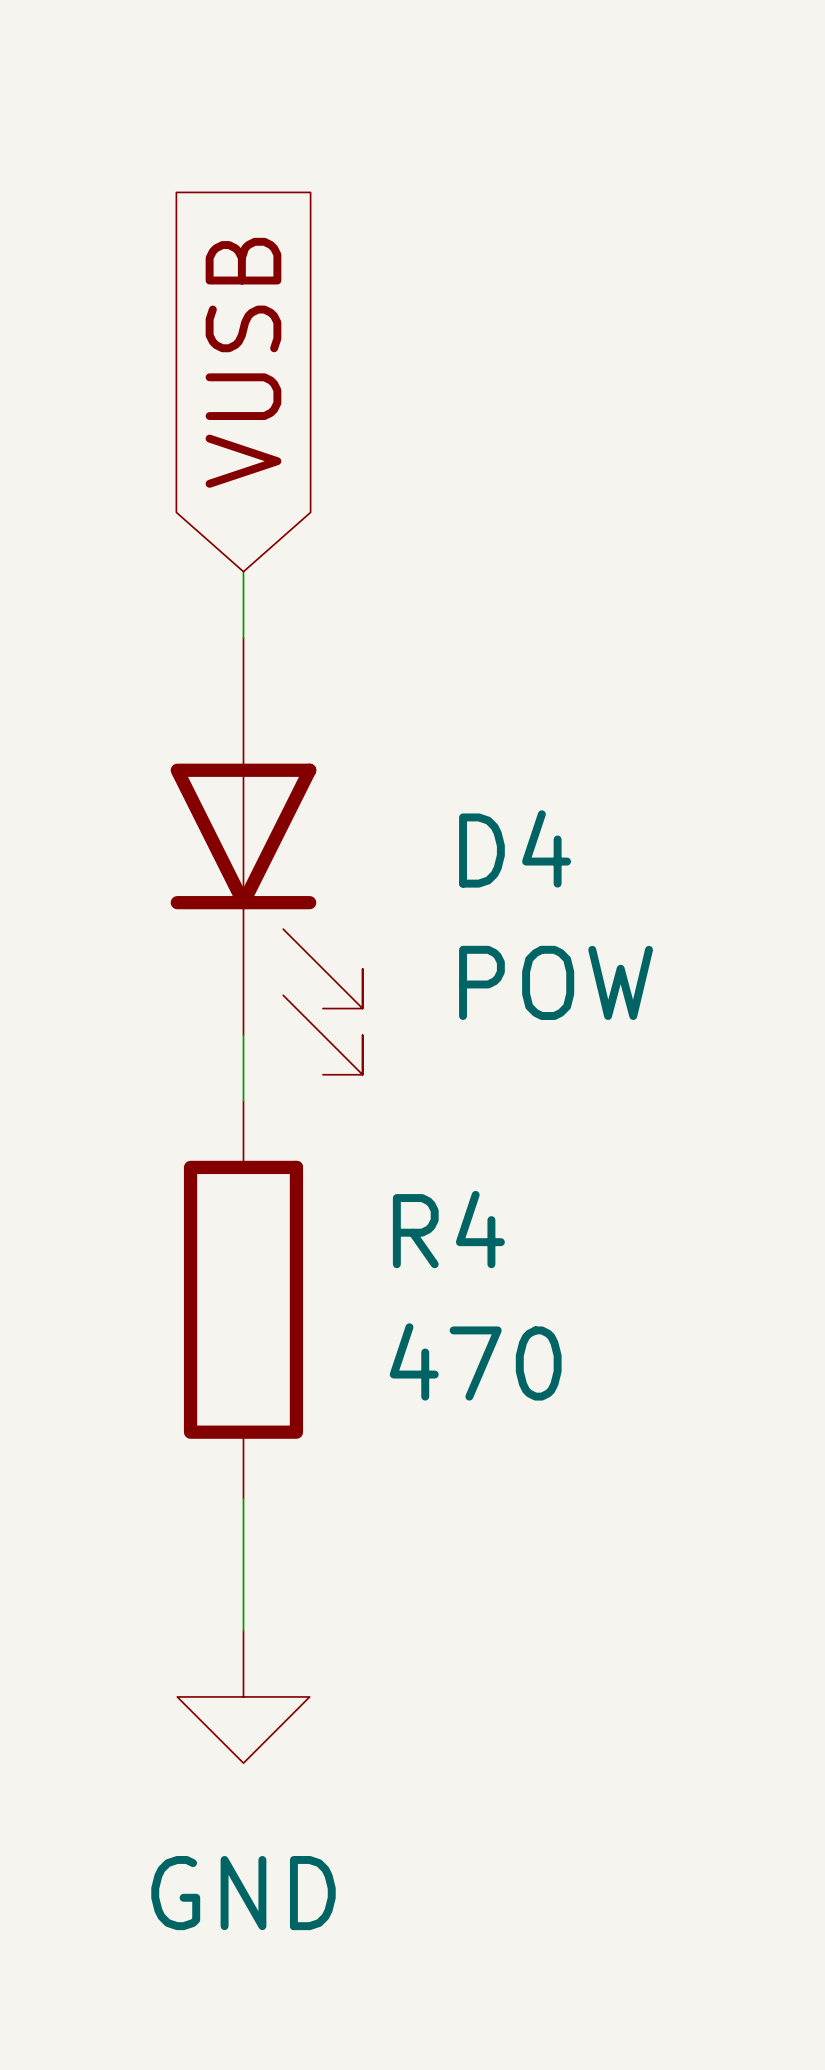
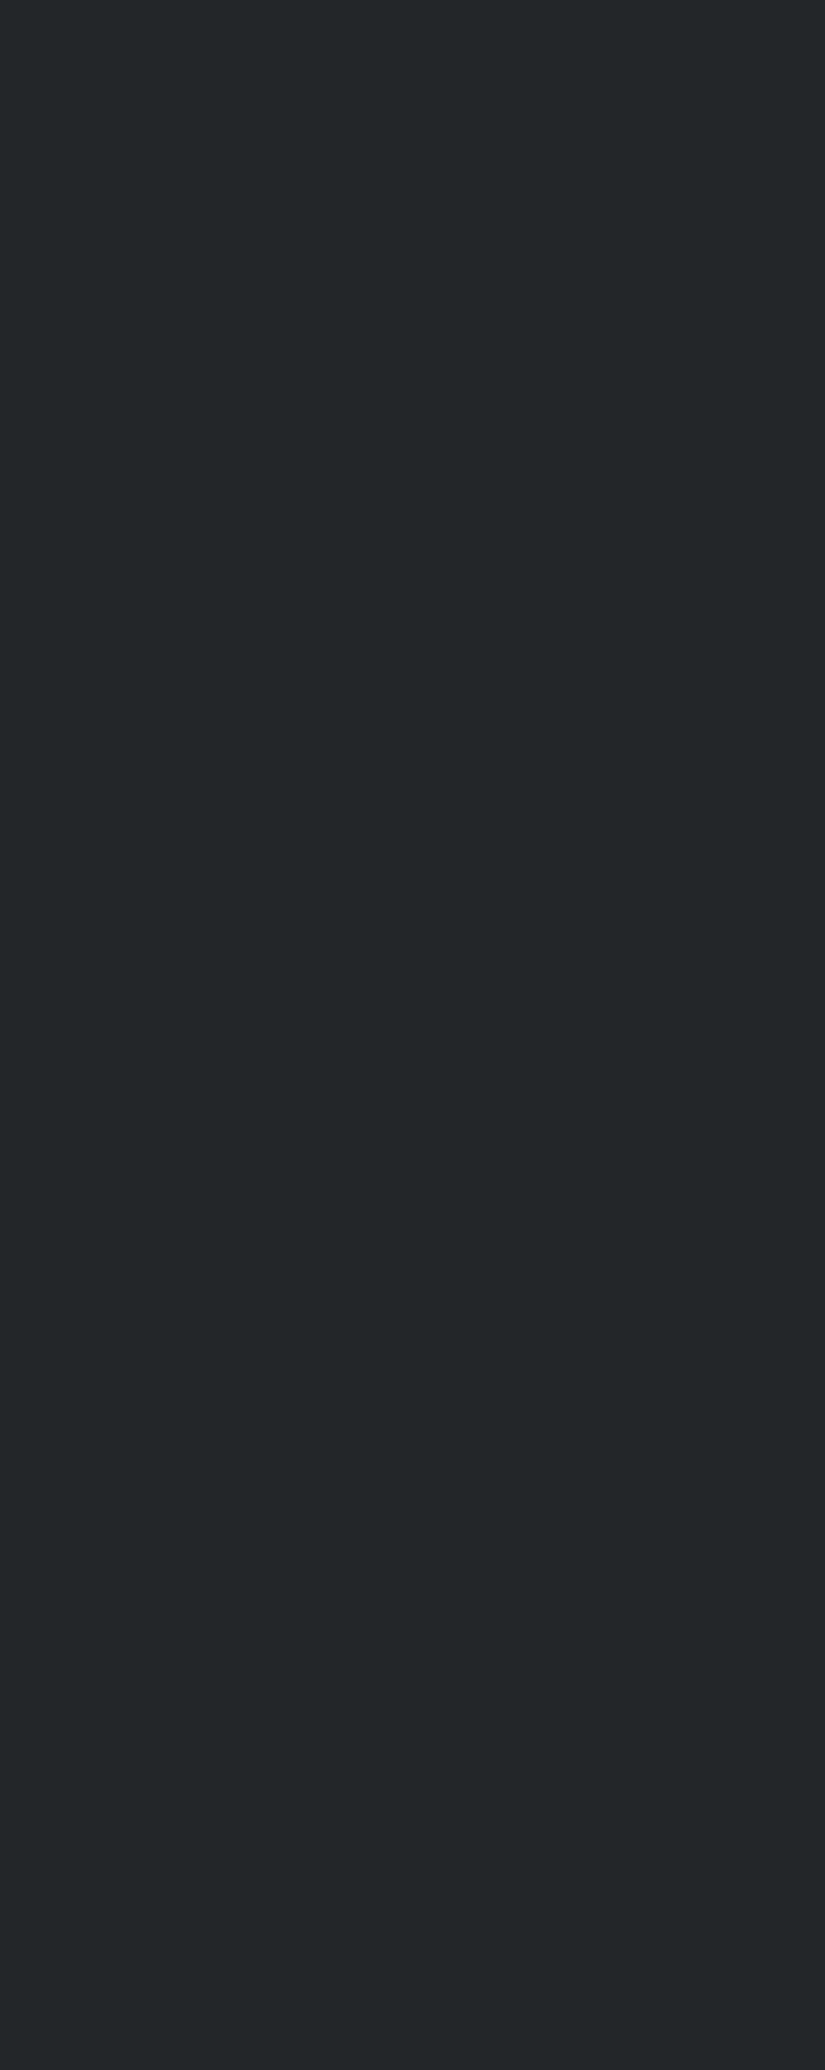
global label: VUSB (243, 362) -> none
wire: (243, 571) (243, 637) -> none
D4: POW (266, 856) -> none
wire: (243, 1035) (243, 1101) -> none
R4: 470 (243, 1299) -> none
wire: (243, 1498) (243, 1630) -> none
power symbol: GND (243, 1696) -> none

